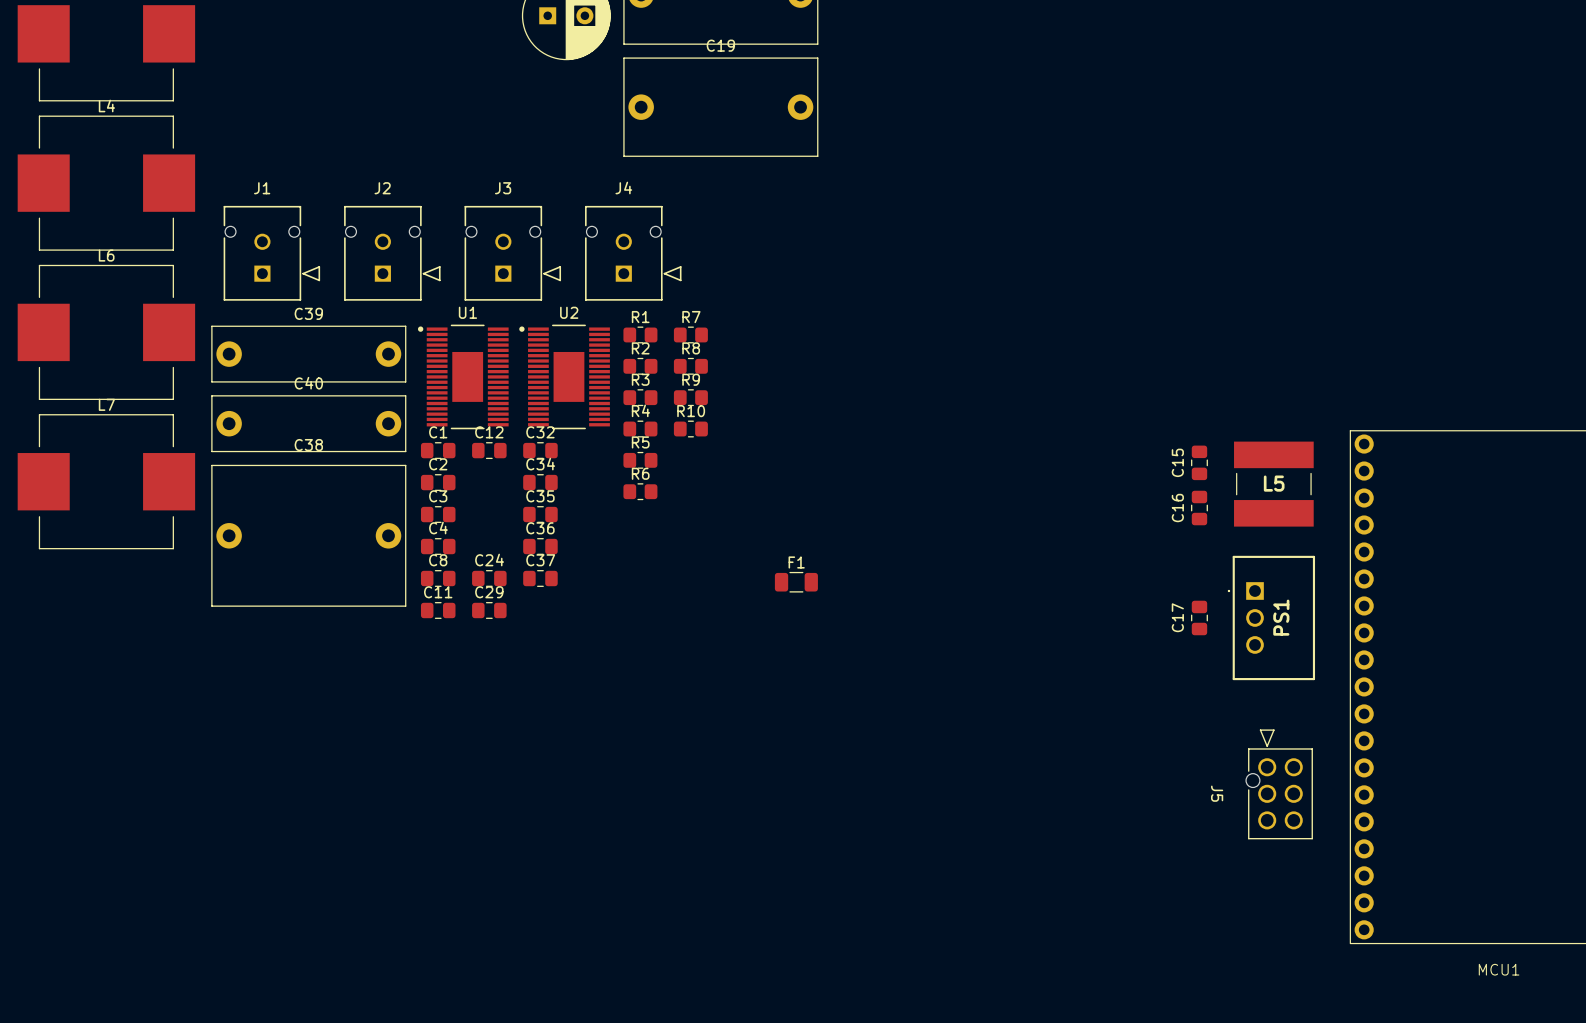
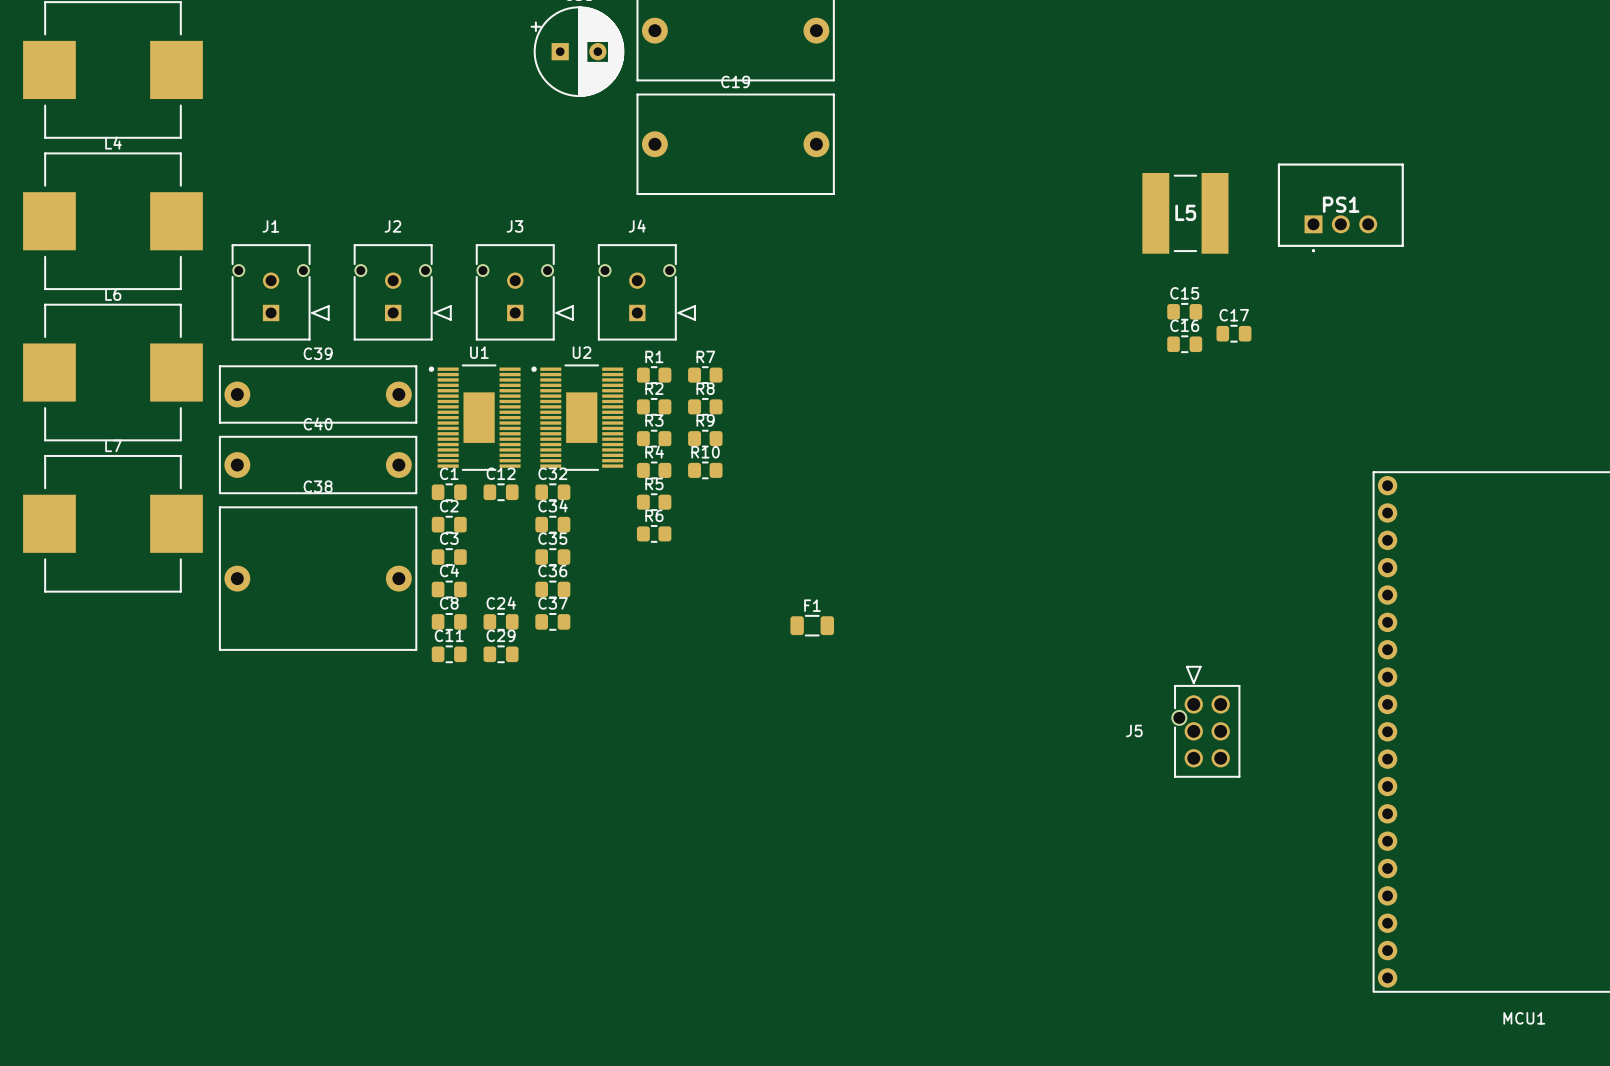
C15 rotation: 0° (1199, 462) -> 90° clockwise (1184, 311)
C15 position: (1199, 462) -> (1184, 311)
L5 rotation: 0° (1273, 484) -> 90° clockwise (1185, 213)
L5 position: (1273, 484) -> (1185, 213)
C16 rotation: 0° (1199, 508) -> 90° clockwise (1184, 344)
C16 position: (1199, 508) -> (1184, 344)
C17 rotation: 0° (1199, 617) -> 90° clockwise (1233, 333)
C17 position: (1199, 617) -> (1233, 333)
PS1 rotation: 0° (1271, 617) -> 90° counterclockwise (1340, 207)
PS1 position: (1271, 617) -> (1340, 207)
J5 position: (1279, 784) -> (1206, 721)
J5 name rotation: 0° (1217, 793) -> 90° counterclockwise (1134, 730)

